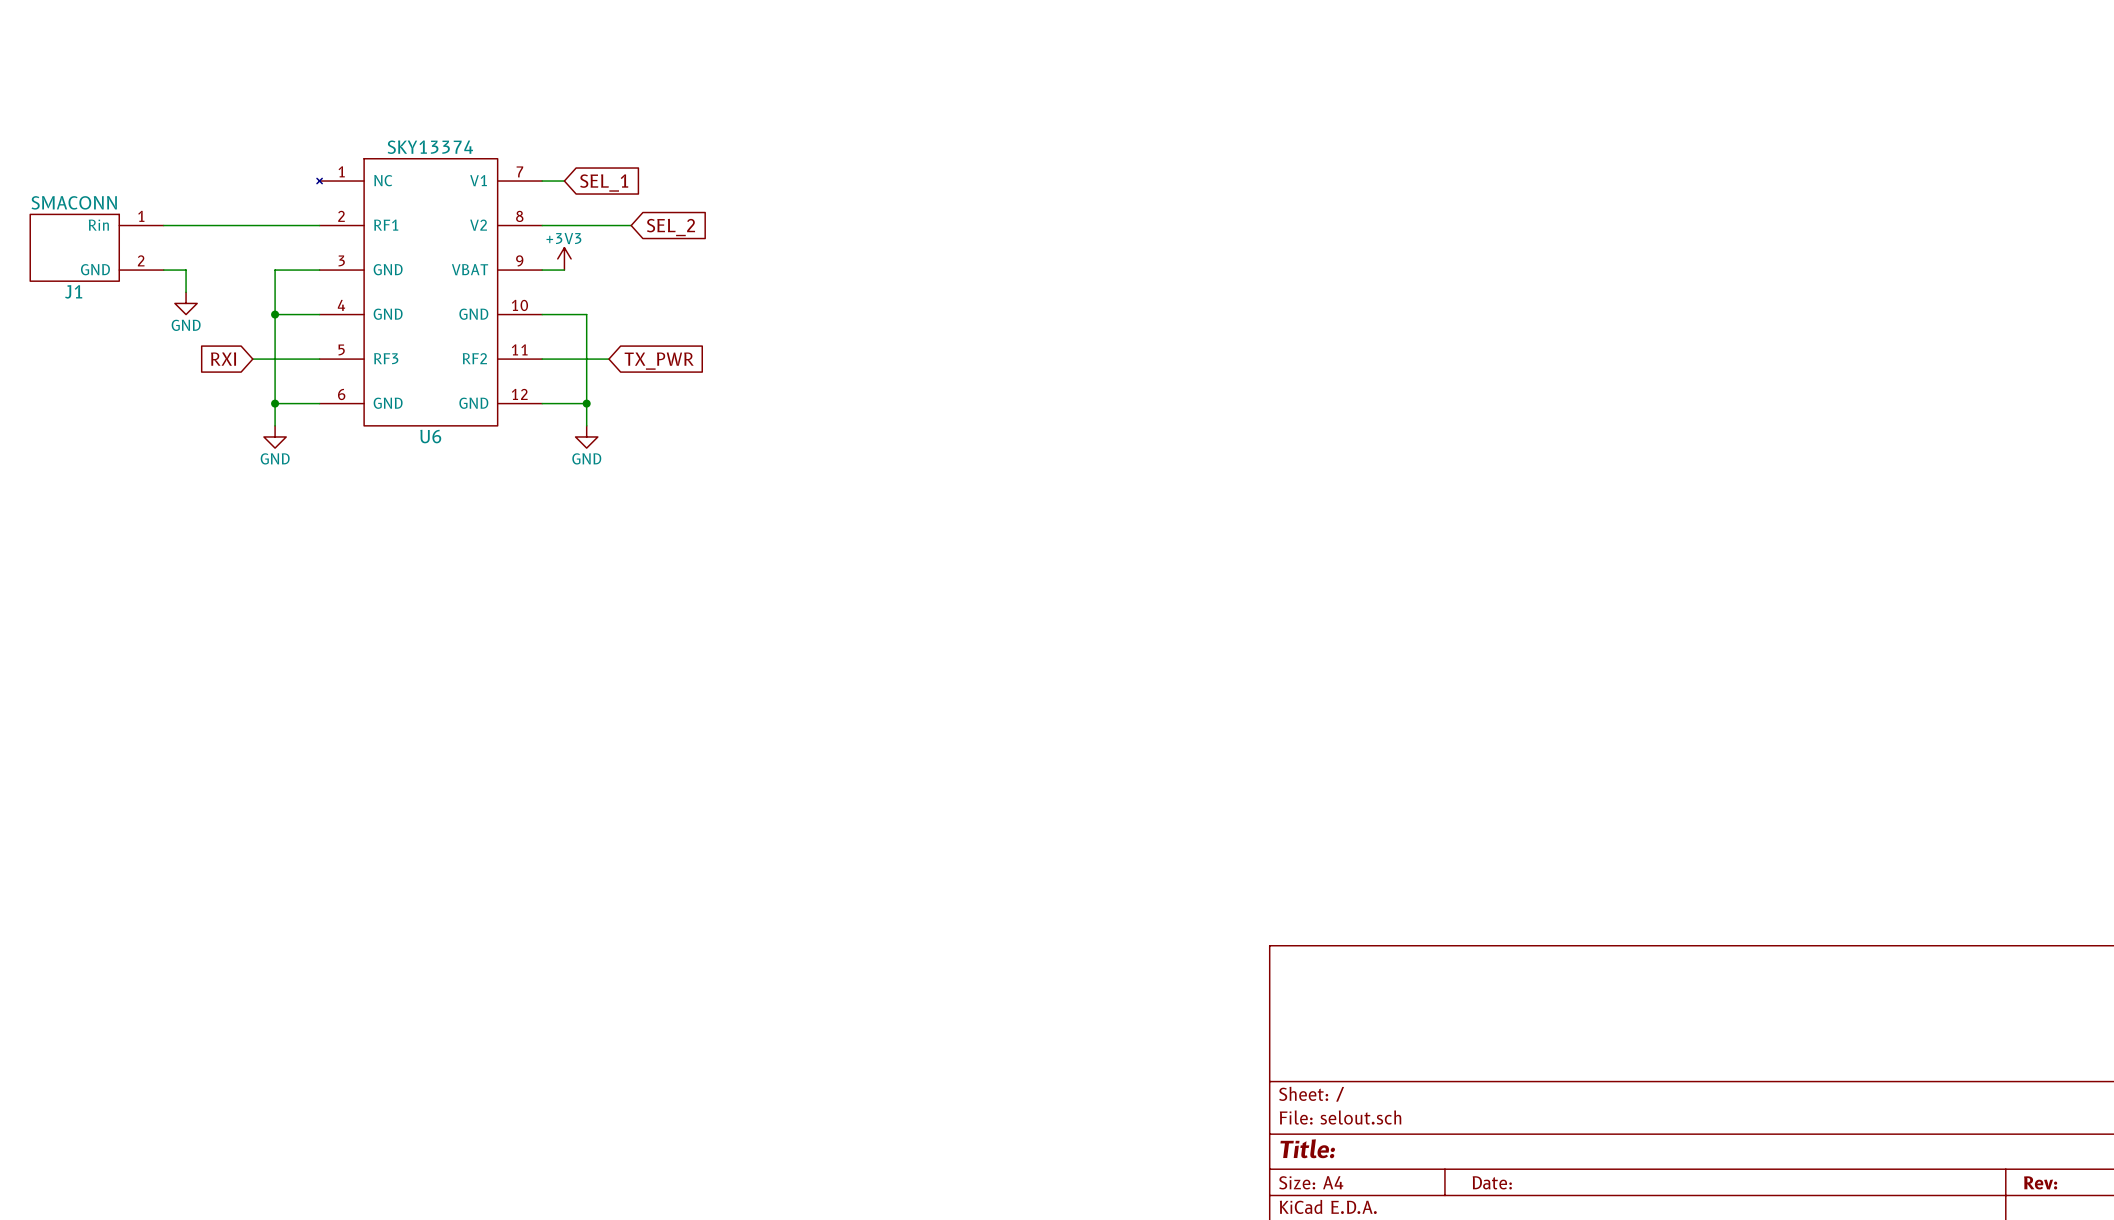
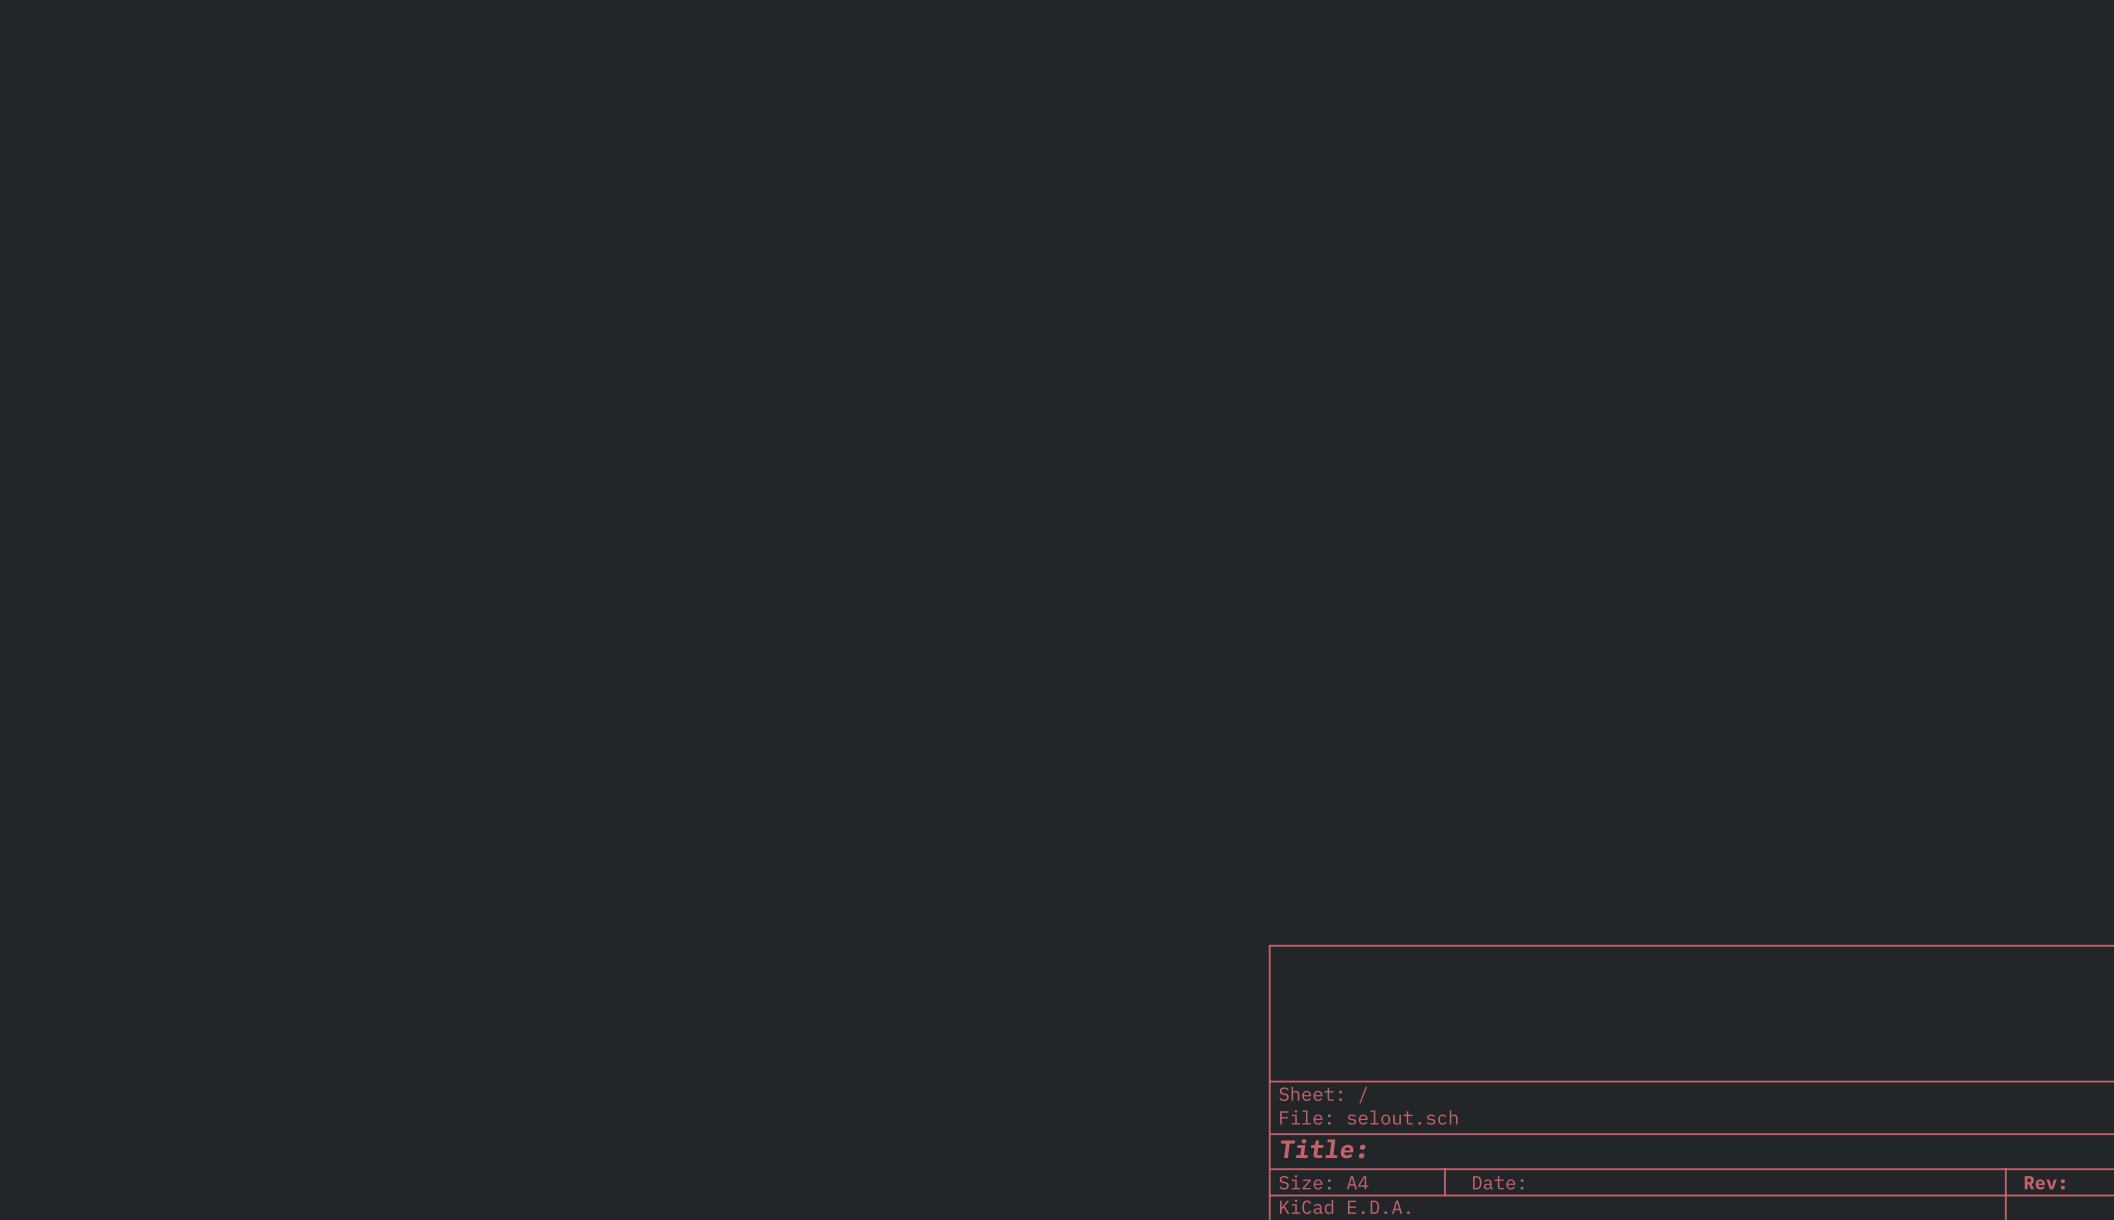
wire: (542, 181) (564, 181) -> none
global label: SEL_1 (604, 183) -> none
wire: (163, 225) (319, 225) -> none
wire: (542, 225) (631, 225) -> none
global label: SEL_2 (670, 227) -> none
J1: SMACONN (97, 247) -> none
power symbol: +3V3 (564, 258) -> none
wire: (163, 270) (186, 270) (186, 292) -> none
wire: (319, 270) (275, 270) (275, 425) -> none
wire: (542, 270) (564, 270) -> none
U6: SKY13374 (429, 292) -> none
power symbol: GND (186, 303) -> none
wire: (275, 314) (319, 314) -> none
junction: (275, 314) -> none
wire: (542, 314) (586, 314) (586, 425) -> none
global label: RXI (223, 359) -> none
wire: (252, 359) (319, 359) -> none
wire: (542, 359) (608, 359) -> none
global label: TX_PWR (659, 361) -> none
wire: (275, 403) (319, 403) -> none
junction: (275, 403) -> none
wire: (542, 403) (586, 403) -> none
junction: (586, 403) -> none
power symbol: GND (275, 436) -> none
power symbol: GND (586, 436) -> none

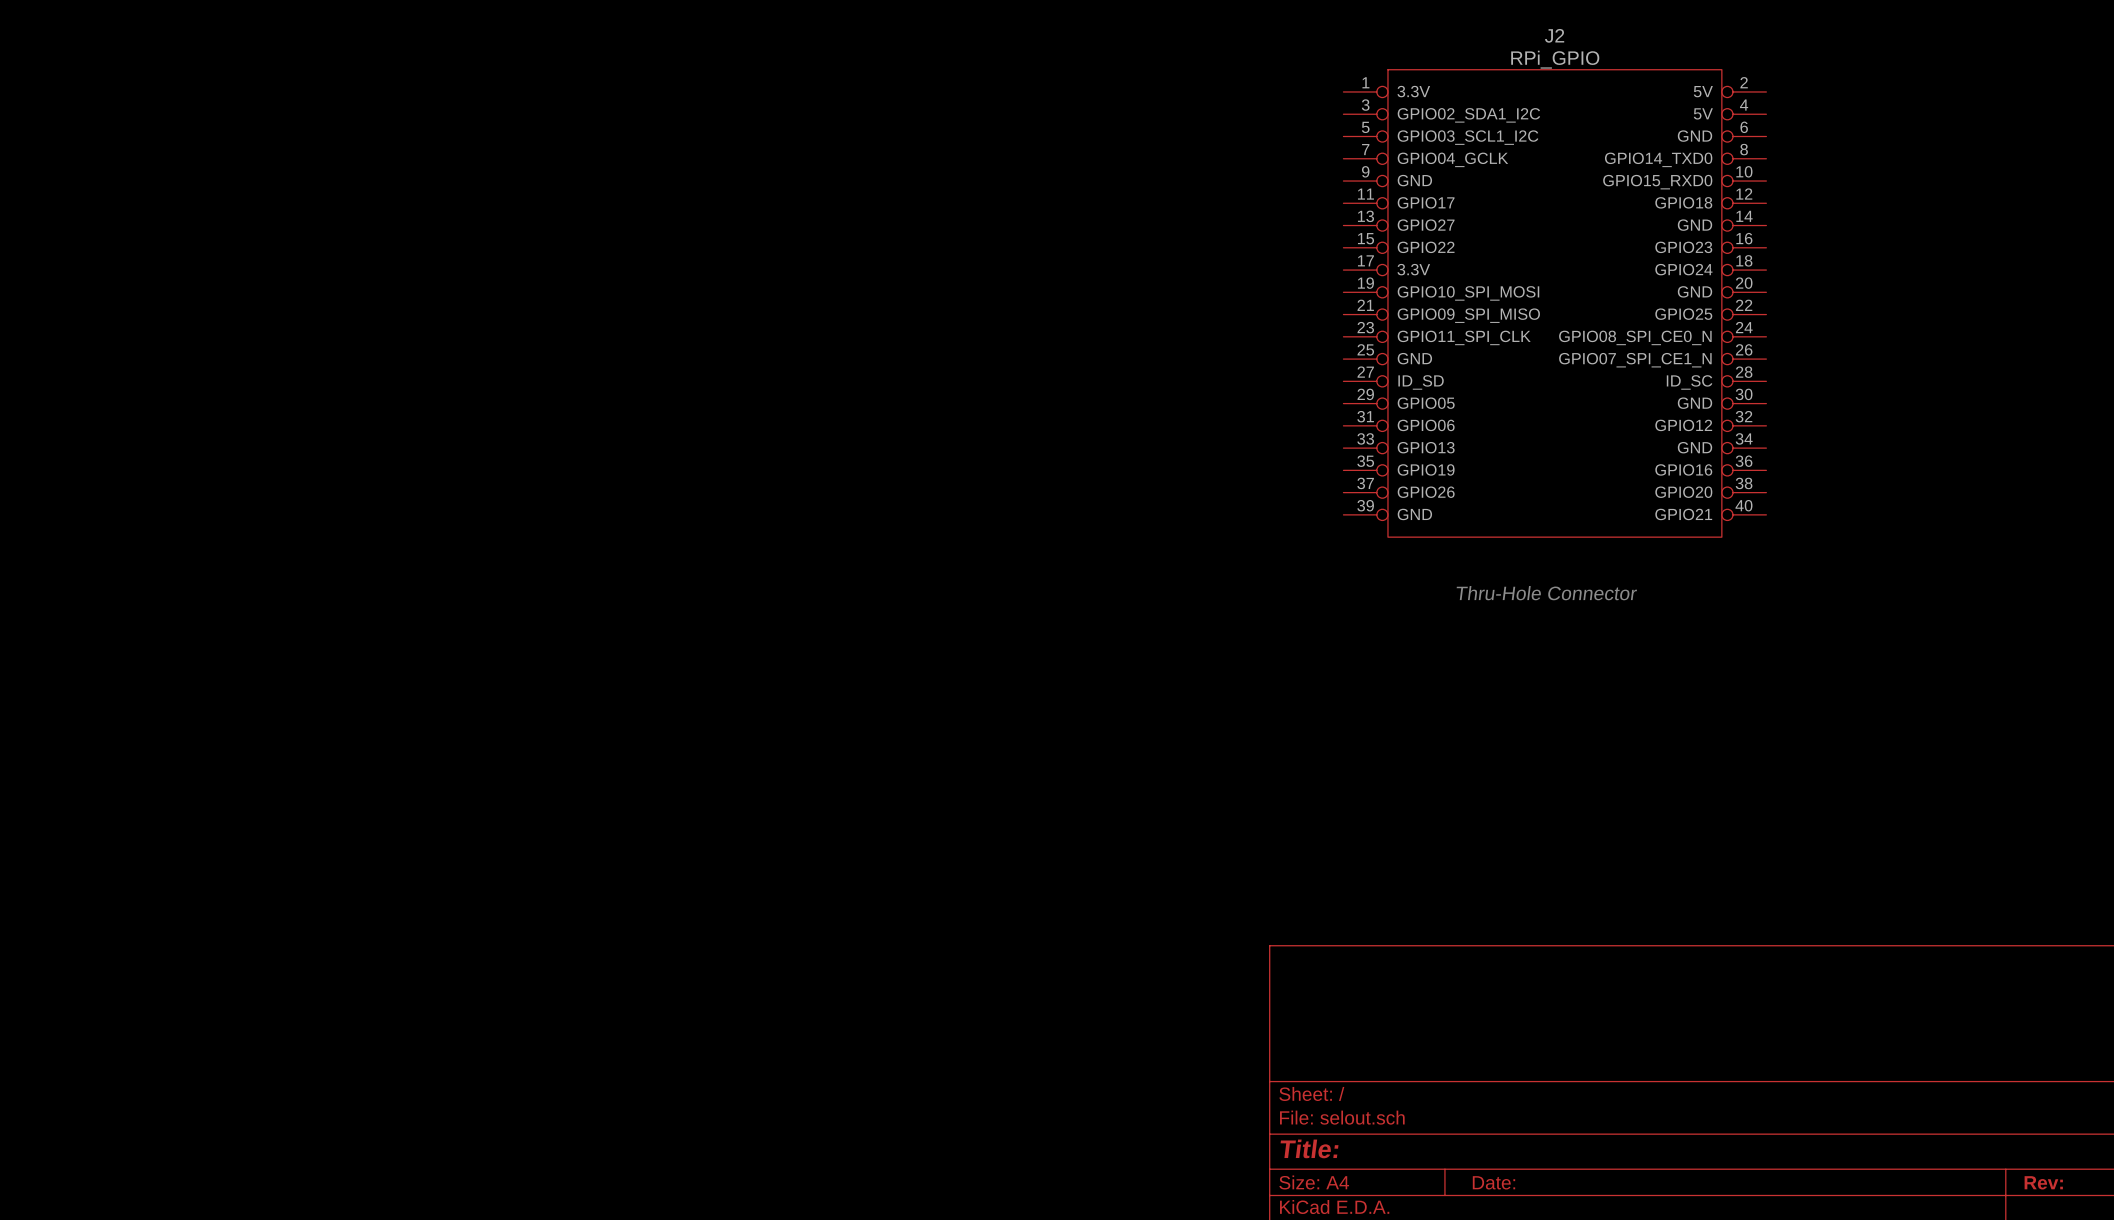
J2: none -> RPi_GPIO (1554, 303)
text: none -> Thru-Hole Connector (1546, 593)

